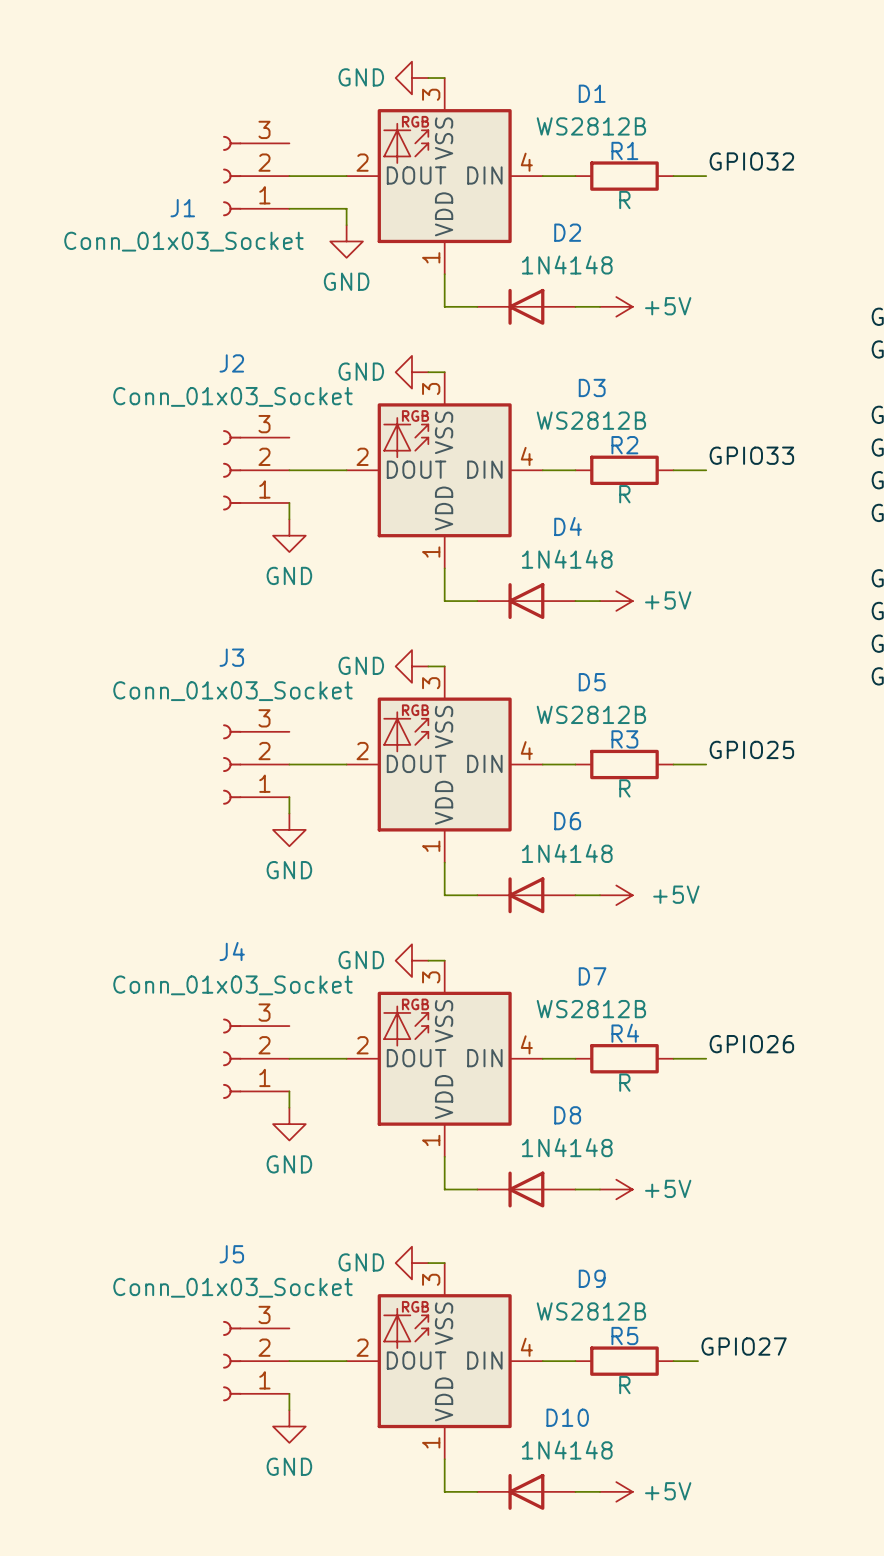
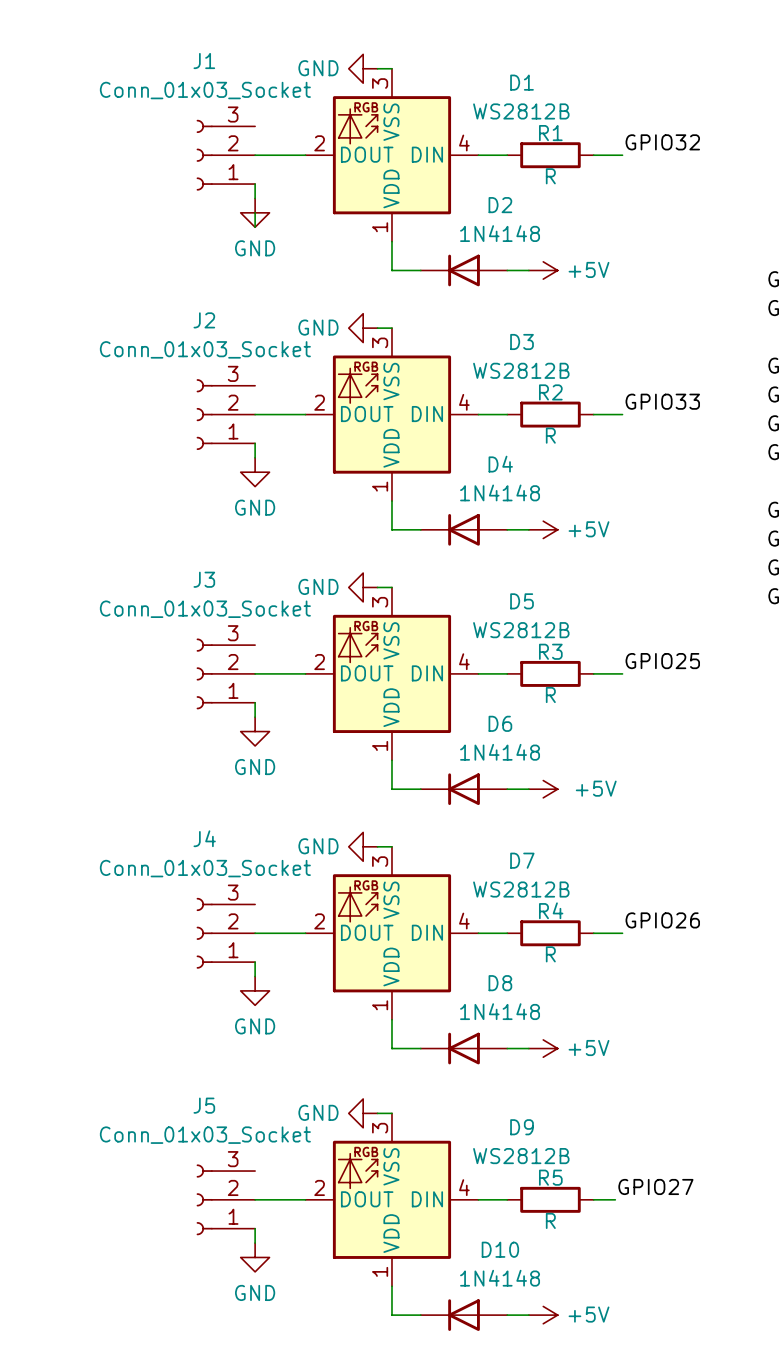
J1 name position: J1 (182, 208) -> J1 (204, 61)
wire: (289, 208) (346, 208) (346, 225) -> (255, 184) (255, 198)
J1 value position: Conn_01x03_Socket (183, 241) -> Conn_01x03_Socket (205, 90)
wire: none -> (255, 212) (255, 227)
power symbol position: GND (346, 241) -> GND (255, 212)

